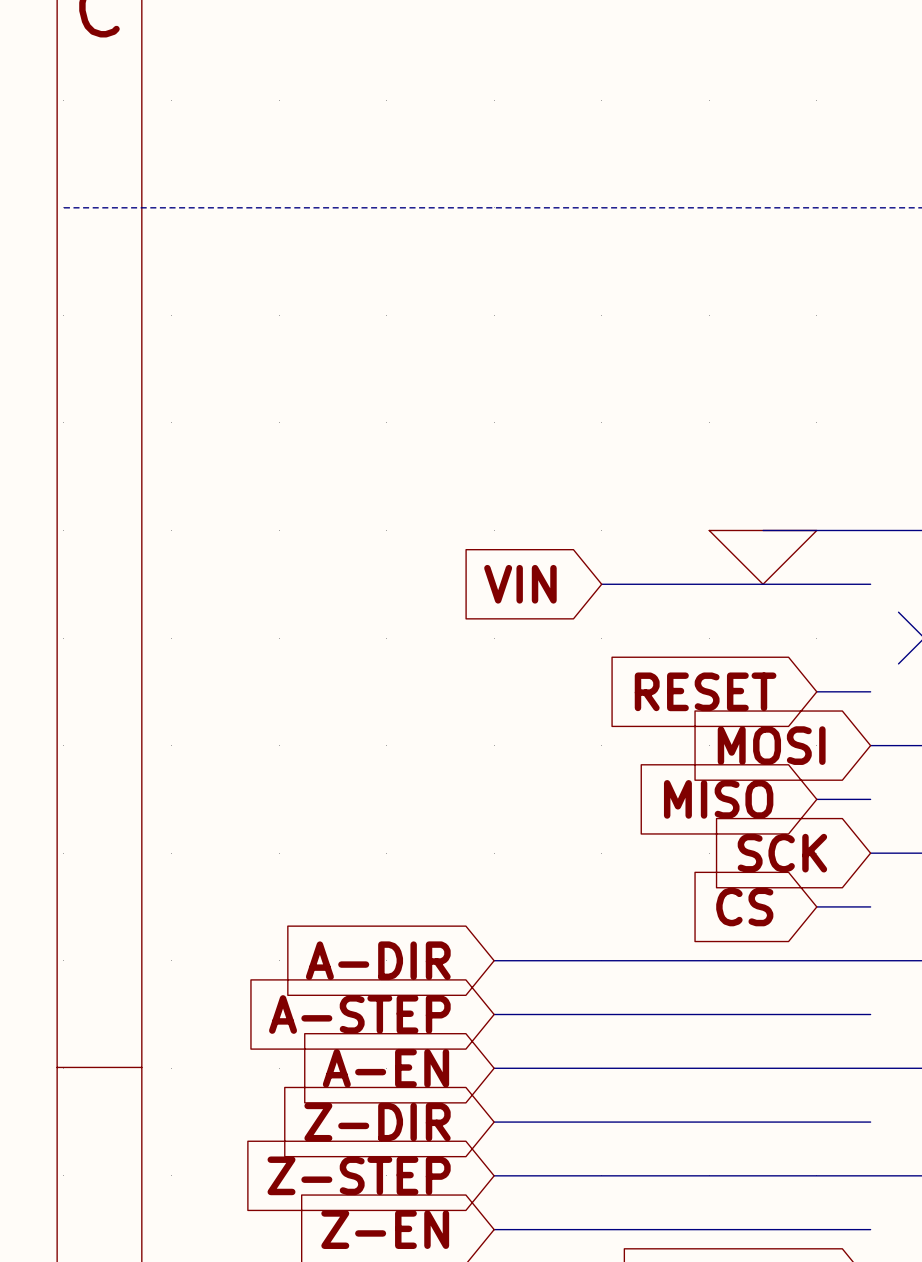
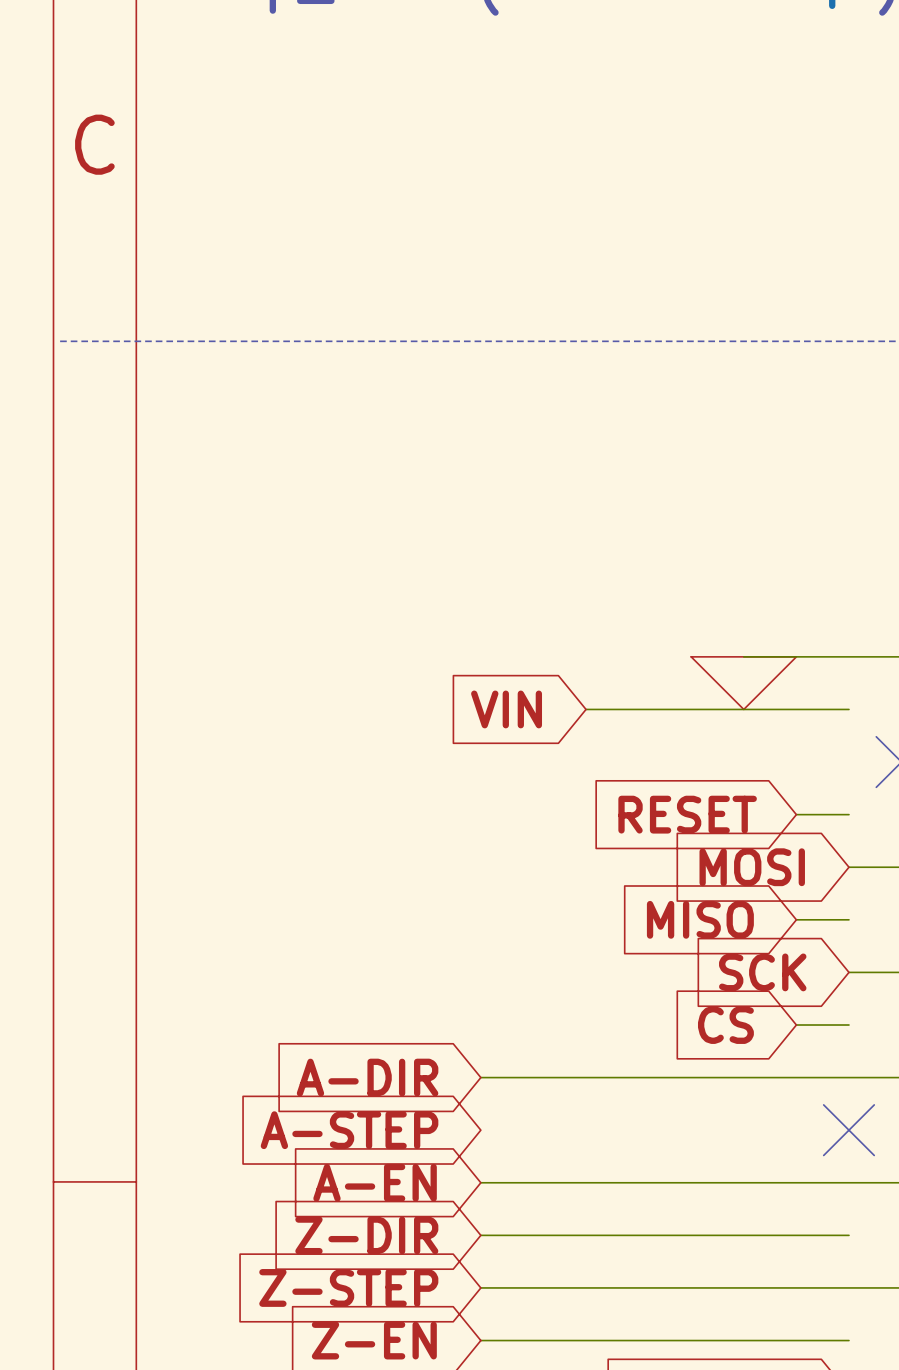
wire: (494, 1014) (870, 1014) -> none
no-connect mark: none -> (848, 1130)

